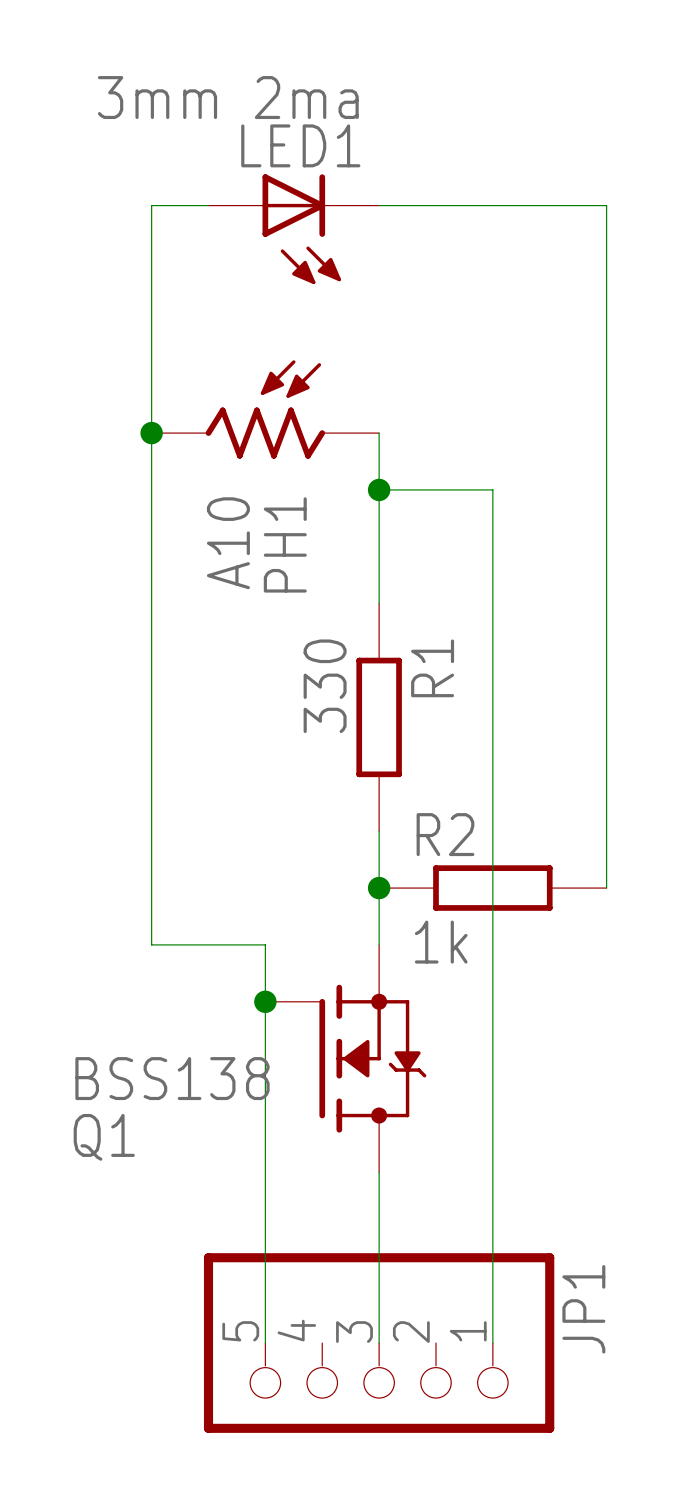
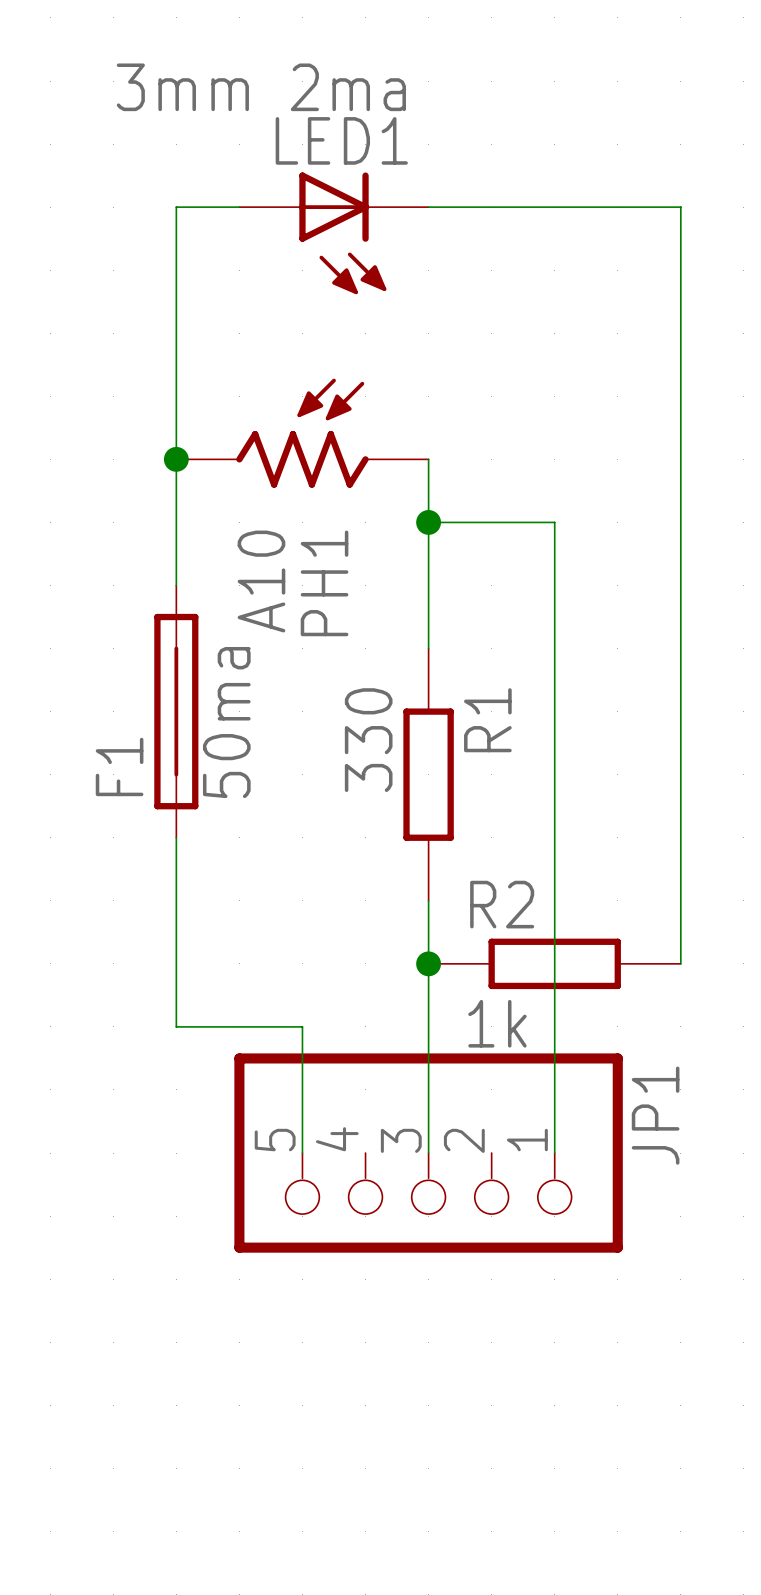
F1: none -> 50ma (176, 711)
junction: (265, 1001) -> none
wire: (265, 1058) (265, 1343) -> none
Q1: BSS138 (345, 1058) -> none
wire: (492, 1058) (492, 1343) -> none
wire: (379, 1172) (379, 1343) -> none
JP1 position: (379, 1343) -> (428, 1153)

